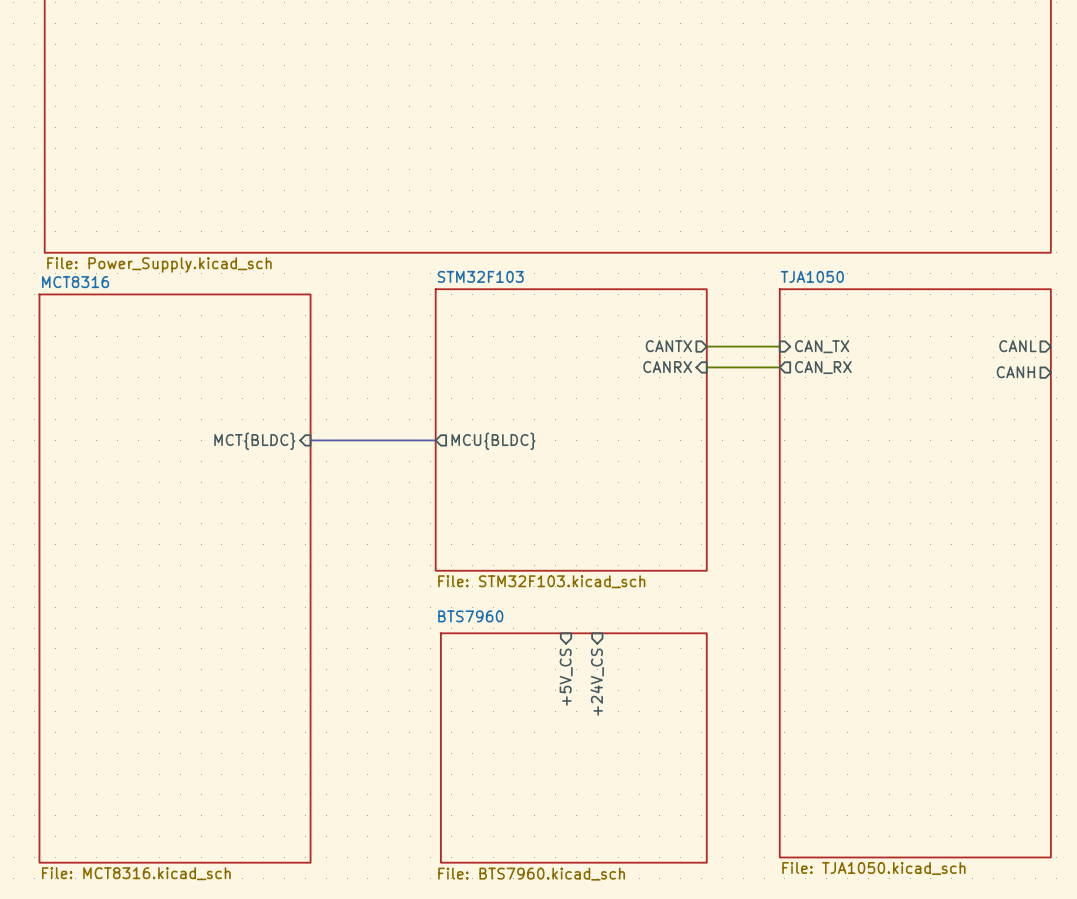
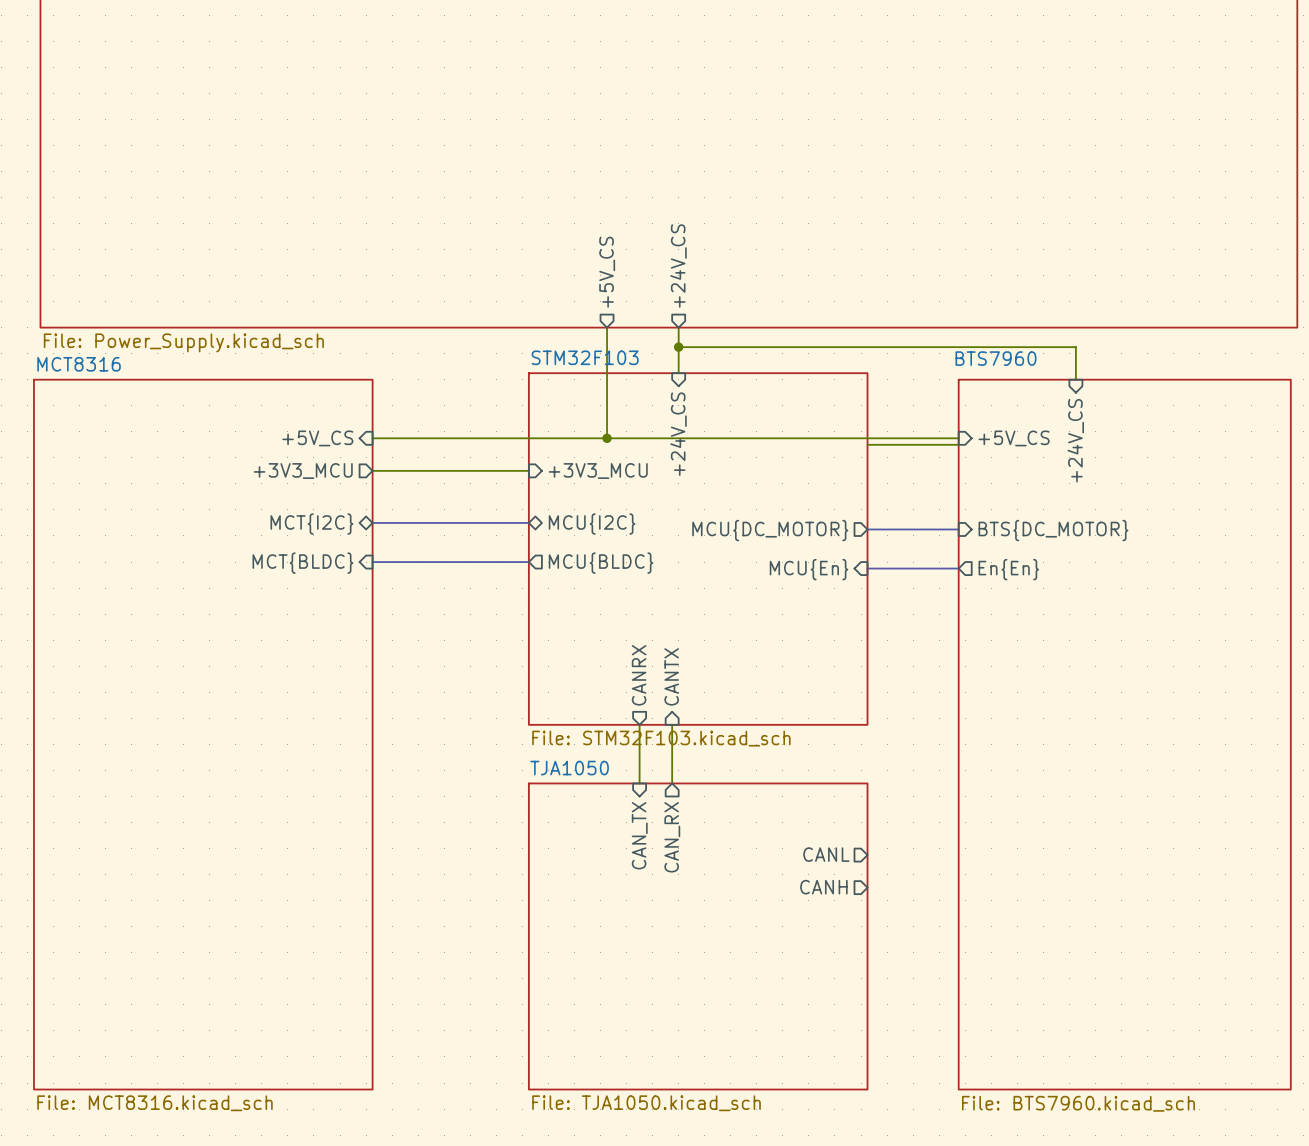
sheet pin: none -> +24V_CS (678, 266)
sheet pin: none -> +5V_CS (607, 272)
wire: none -> (607, 327) (607, 438)
wire: none -> (678, 327) (678, 373)
wire: none -> (678, 347) (1075, 347) (1075, 379)
junction: none -> (678, 347)
sheet TJA1050 name position: TJA1050 (812, 276) -> TJA1050 (569, 768)
sheet TJA1050 shape: [779, 288, 1052, 859] -> [528, 782, 869, 1091]
sheet pin: none -> +24V_CS (678, 434)
sheet pin: none -> +5V_CS (317, 438)
wire: none -> (372, 438) (958, 438)
junction: none -> (607, 438)
sheet pin: none -> +24V_CS (1075, 440)
sheet pin: CANTX (668, 346) -> none
sheet pin: CAN_TX (822, 346) -> +5V_CS (1014, 438)
sheet pin: CANL (1017, 346) -> none
sheet pin: none -> +3V3_MCU (303, 471)
wire: none -> (372, 470) (528, 470)
sheet pin: none -> +3V3_MCU (598, 471)
sheet pin: CANRX (667, 367) -> none
wire: (706, 367) (779, 367) -> none
sheet pin: CAN_RX (823, 367) -> none
sheet pin: CANH (1015, 372) -> none
sheet pin: none -> MCT{I2C} (311, 524)
bus: none -> (372, 522) (528, 522)
sheet pin: none -> MCU{I2C} (592, 524)
bus: none -> (867, 529) (958, 529)
sheet pin: none -> MCU{DC_MOTOR} (770, 530)
sheet pin: none -> BTS{DC_MOTOR} (1053, 530)
bus: none -> (867, 568) (958, 568)
sheet pin: none -> MCU{En} (809, 569)
sheet pin: none -> En{En} (1008, 569)
sheet pin: none -> CANRX (639, 675)
sheet pin: none -> CANTX (671, 676)
wire: none -> (639, 724) (639, 783)
wire: none -> (672, 724) (672, 783)
sheet BTS7960 name position: BTS7960 (470, 616) -> BTS7960 (995, 358)
sheet BTS7960 shape: [440, 632, 708, 864] -> [957, 378, 1292, 1091]
sheet pin: none -> CAN_TX (639, 835)
sheet pin: none -> CAN_RX (672, 837)
sheet pin: none -> CANL (826, 854)
sheet pin: +5V_CS (566, 677) -> none
sheet pin: +24V_CS (597, 682) -> none
sheet pin: none -> CANH (823, 887)
sheet TJA1050 value position: File: TJA1050.kicad_sch (873, 868) -> File: TJA1050.kicad_sch (646, 1103)
sheet BTS7960 value position: File: BTS7960.kicad_sch (531, 874) -> File: BTS7960.kicad_sch (1078, 1103)

